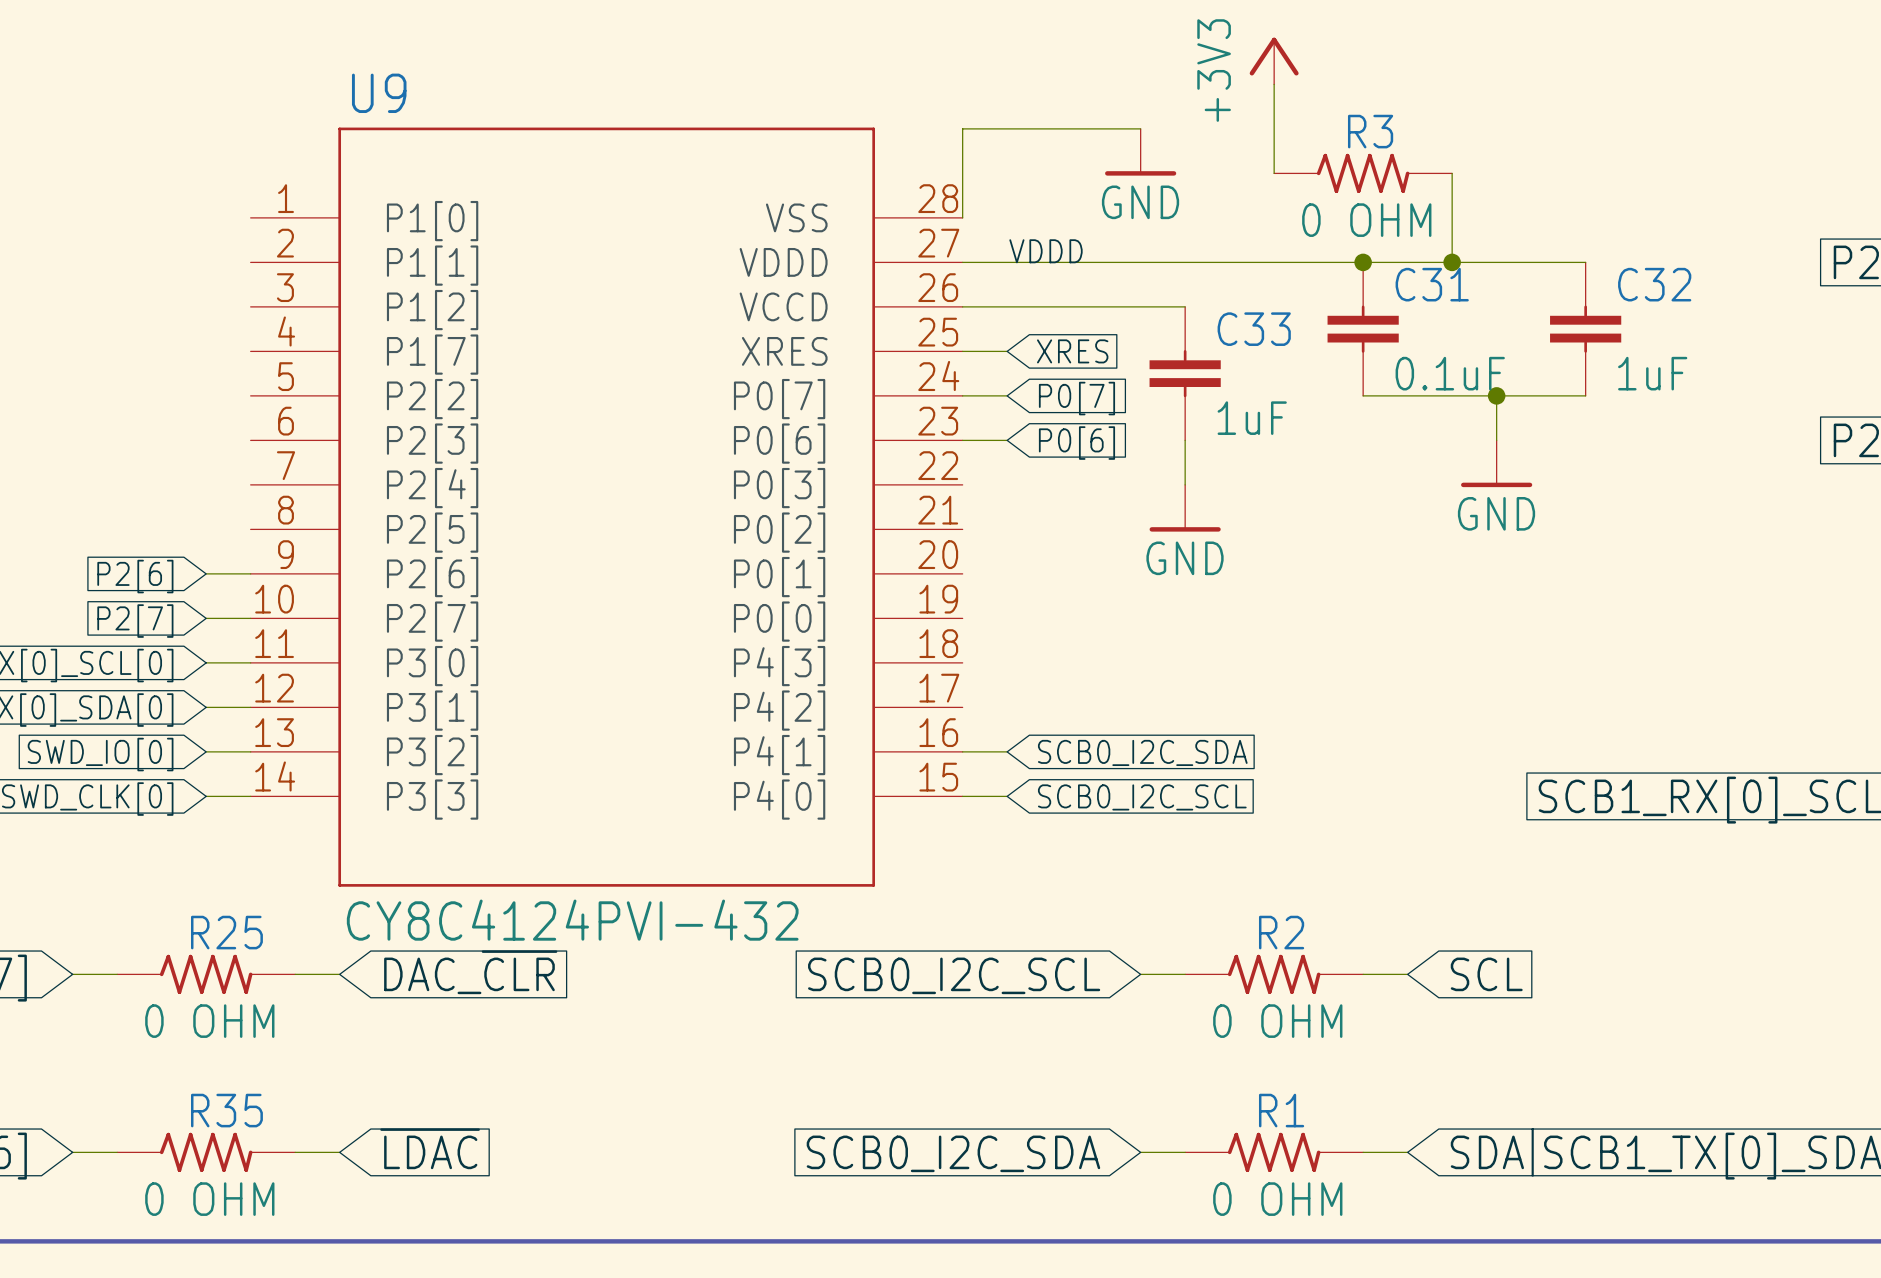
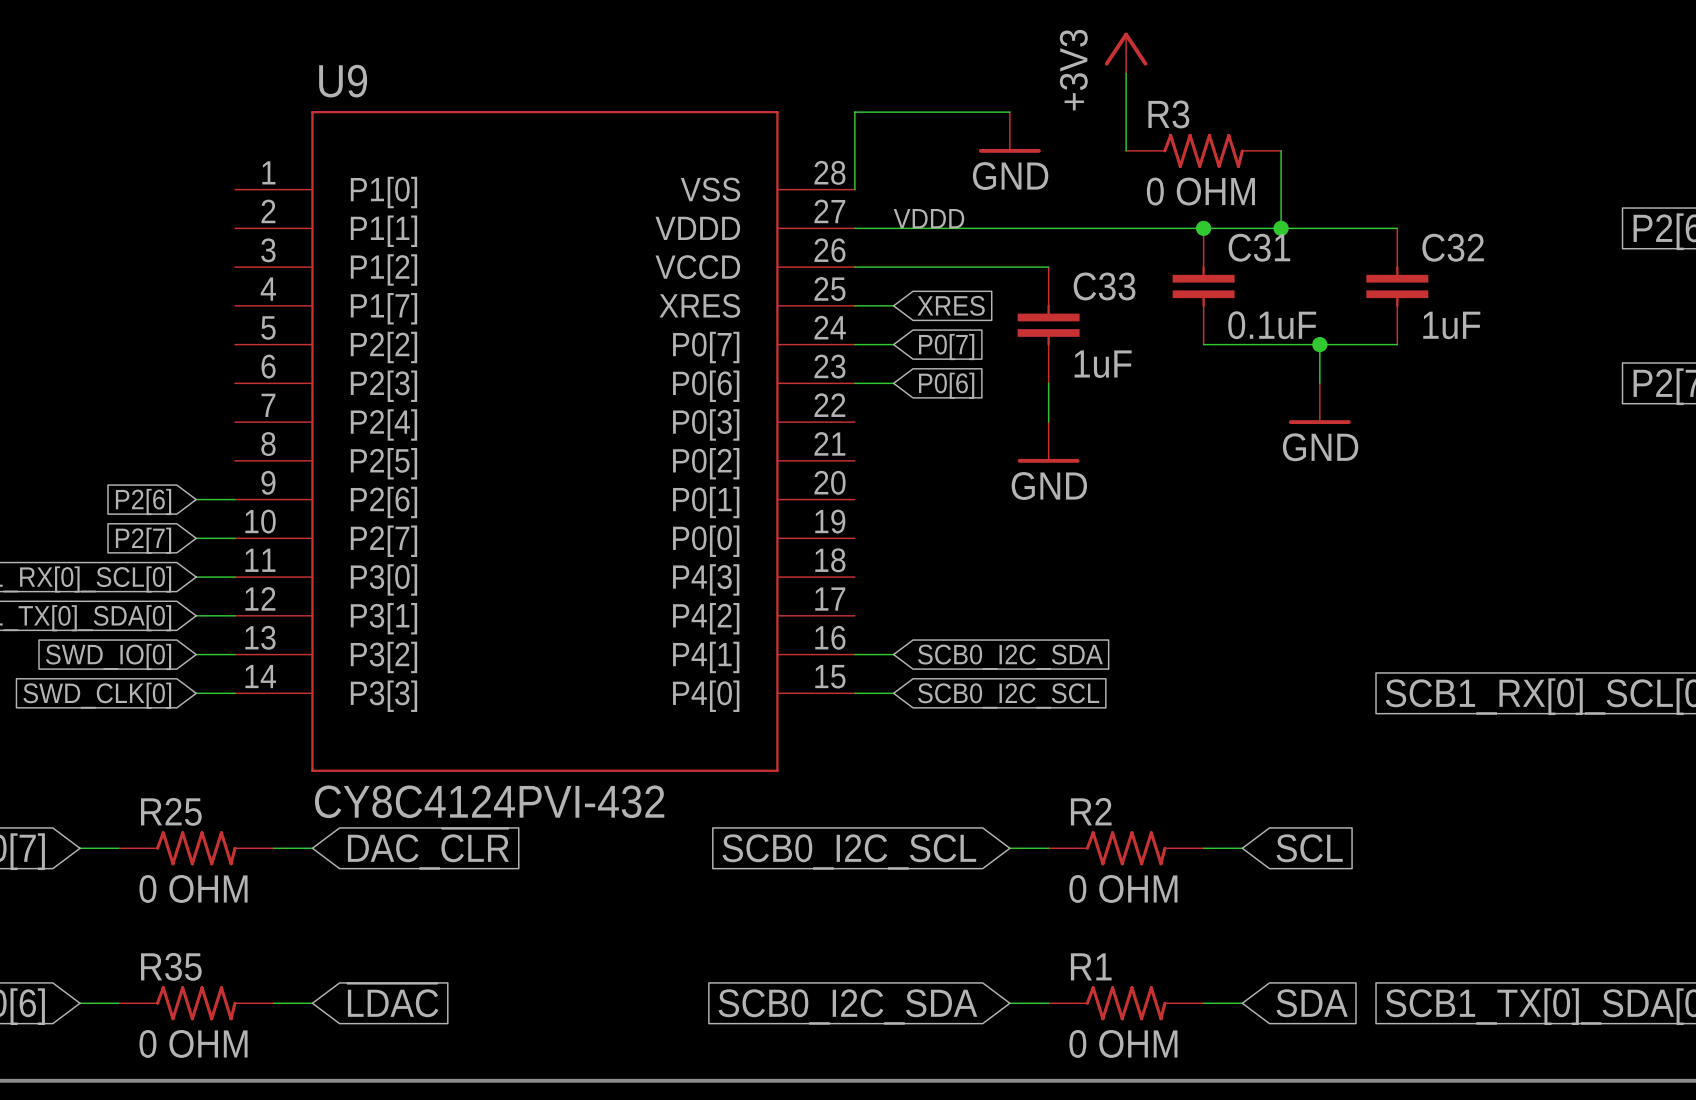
R3 name position: R3 (1370, 131) -> R3 (1168, 114)
R25 name position: R25 (226, 932) -> R25 (171, 811)
R2 name position: R2 (1281, 932) -> R2 (1091, 811)
R35 name position: R35 (226, 1110) -> R35 (171, 966)
R1 name position: R1 (1281, 1110) -> R1 (1091, 966)

